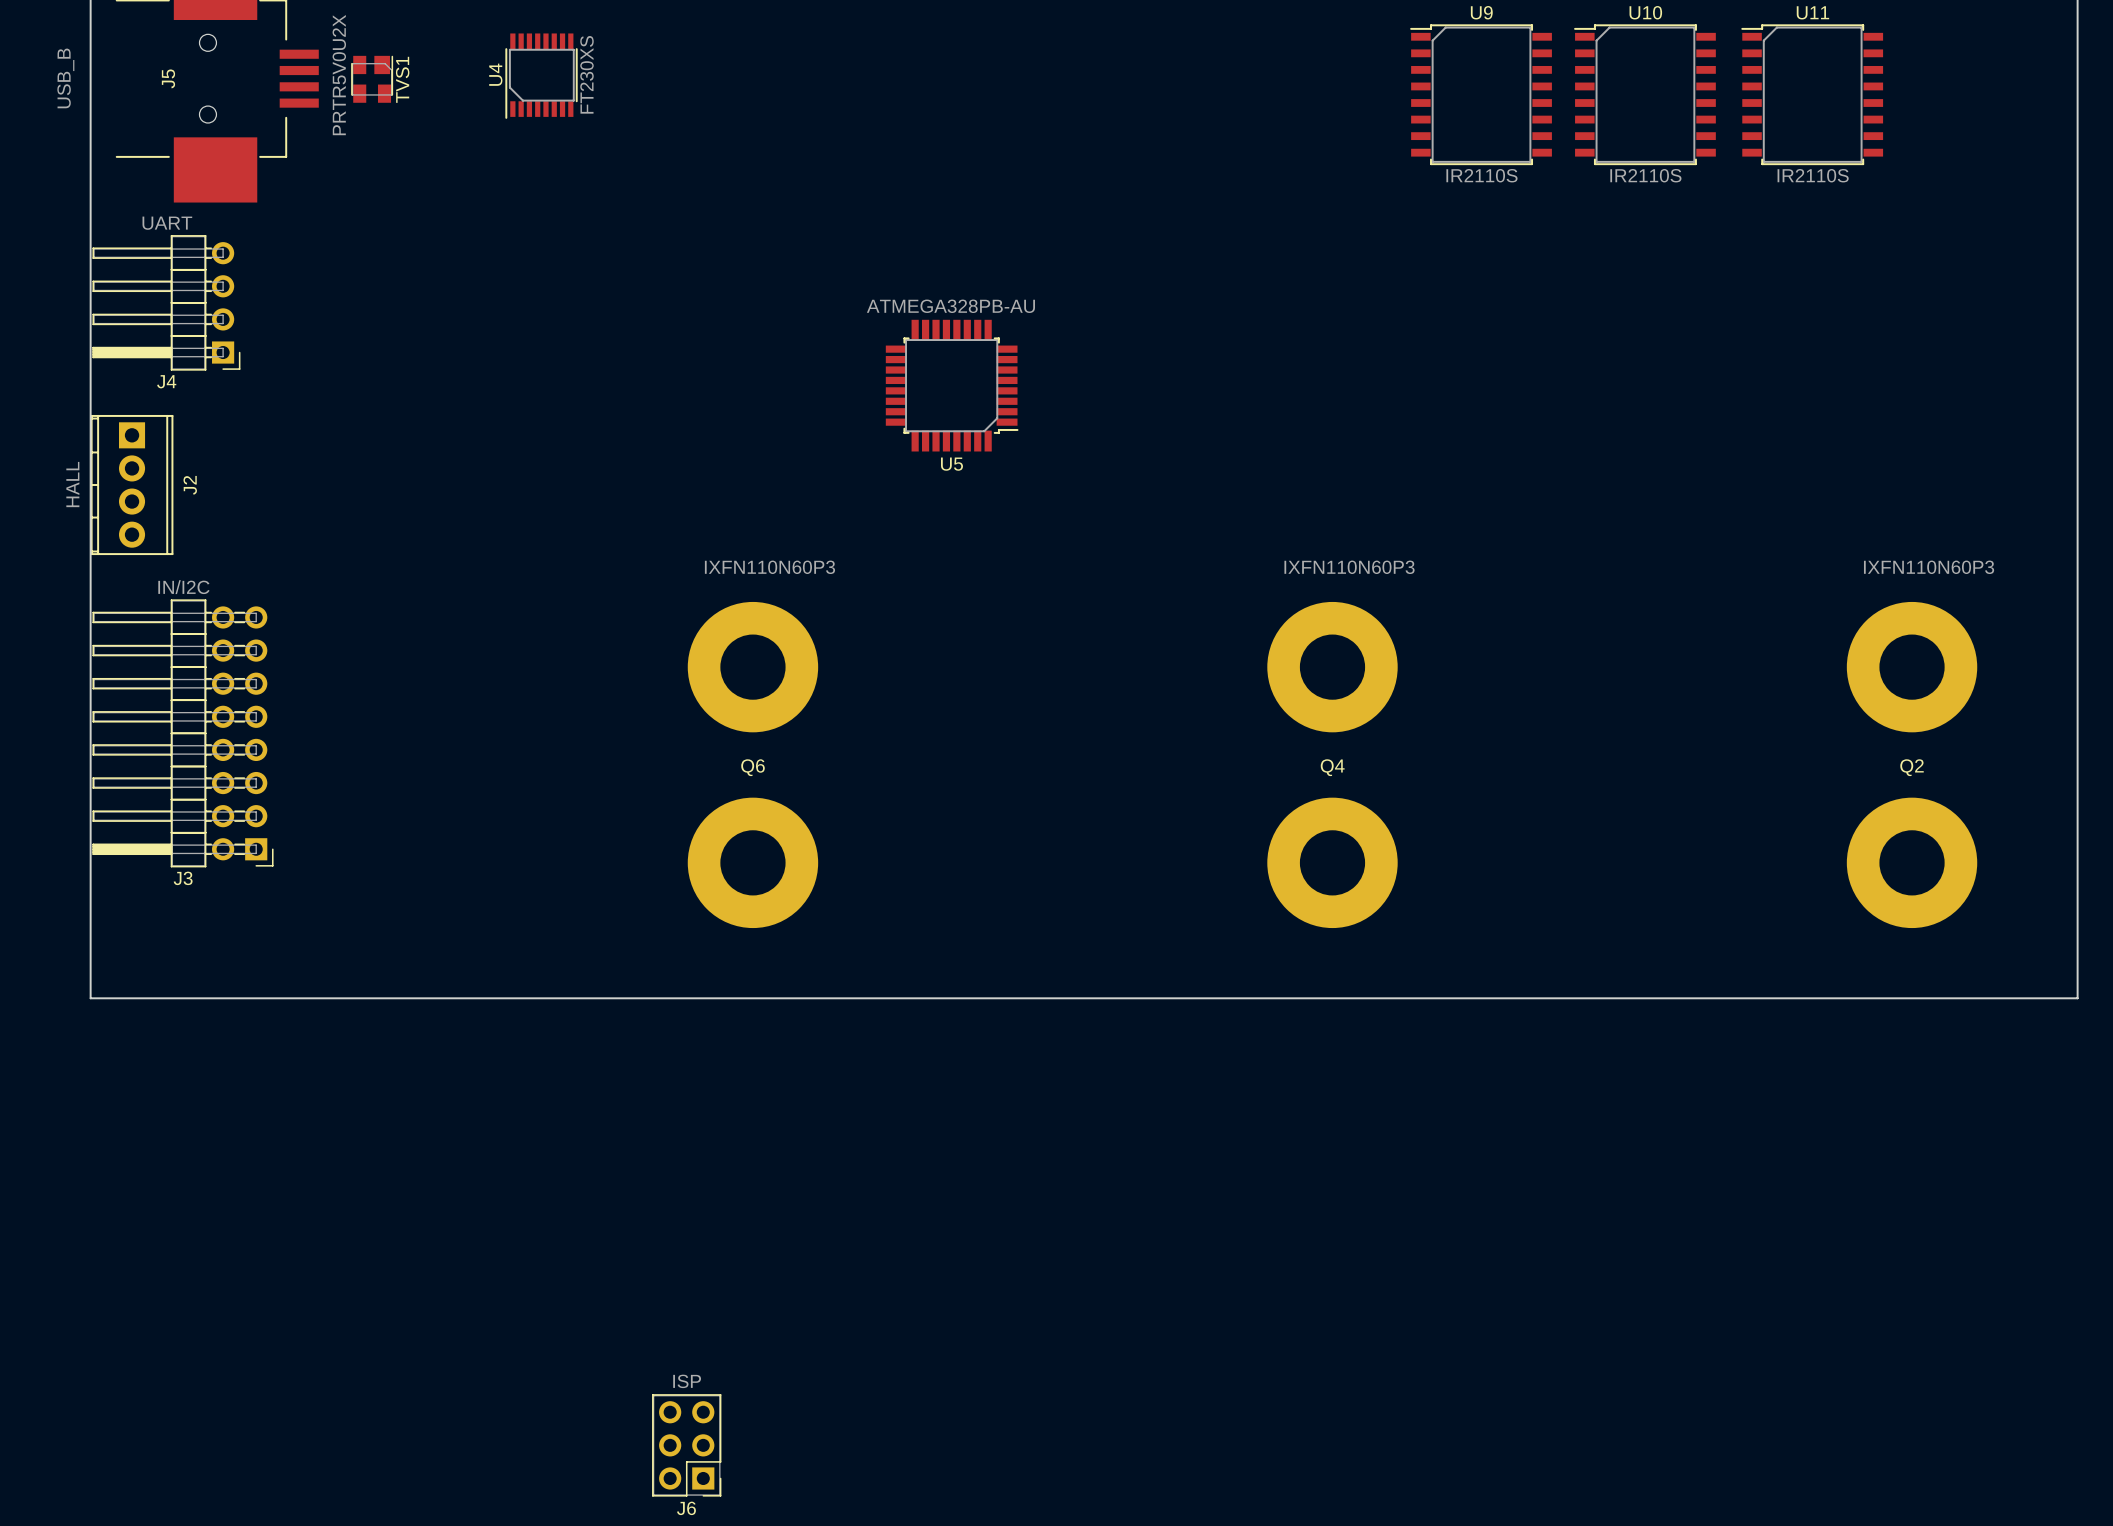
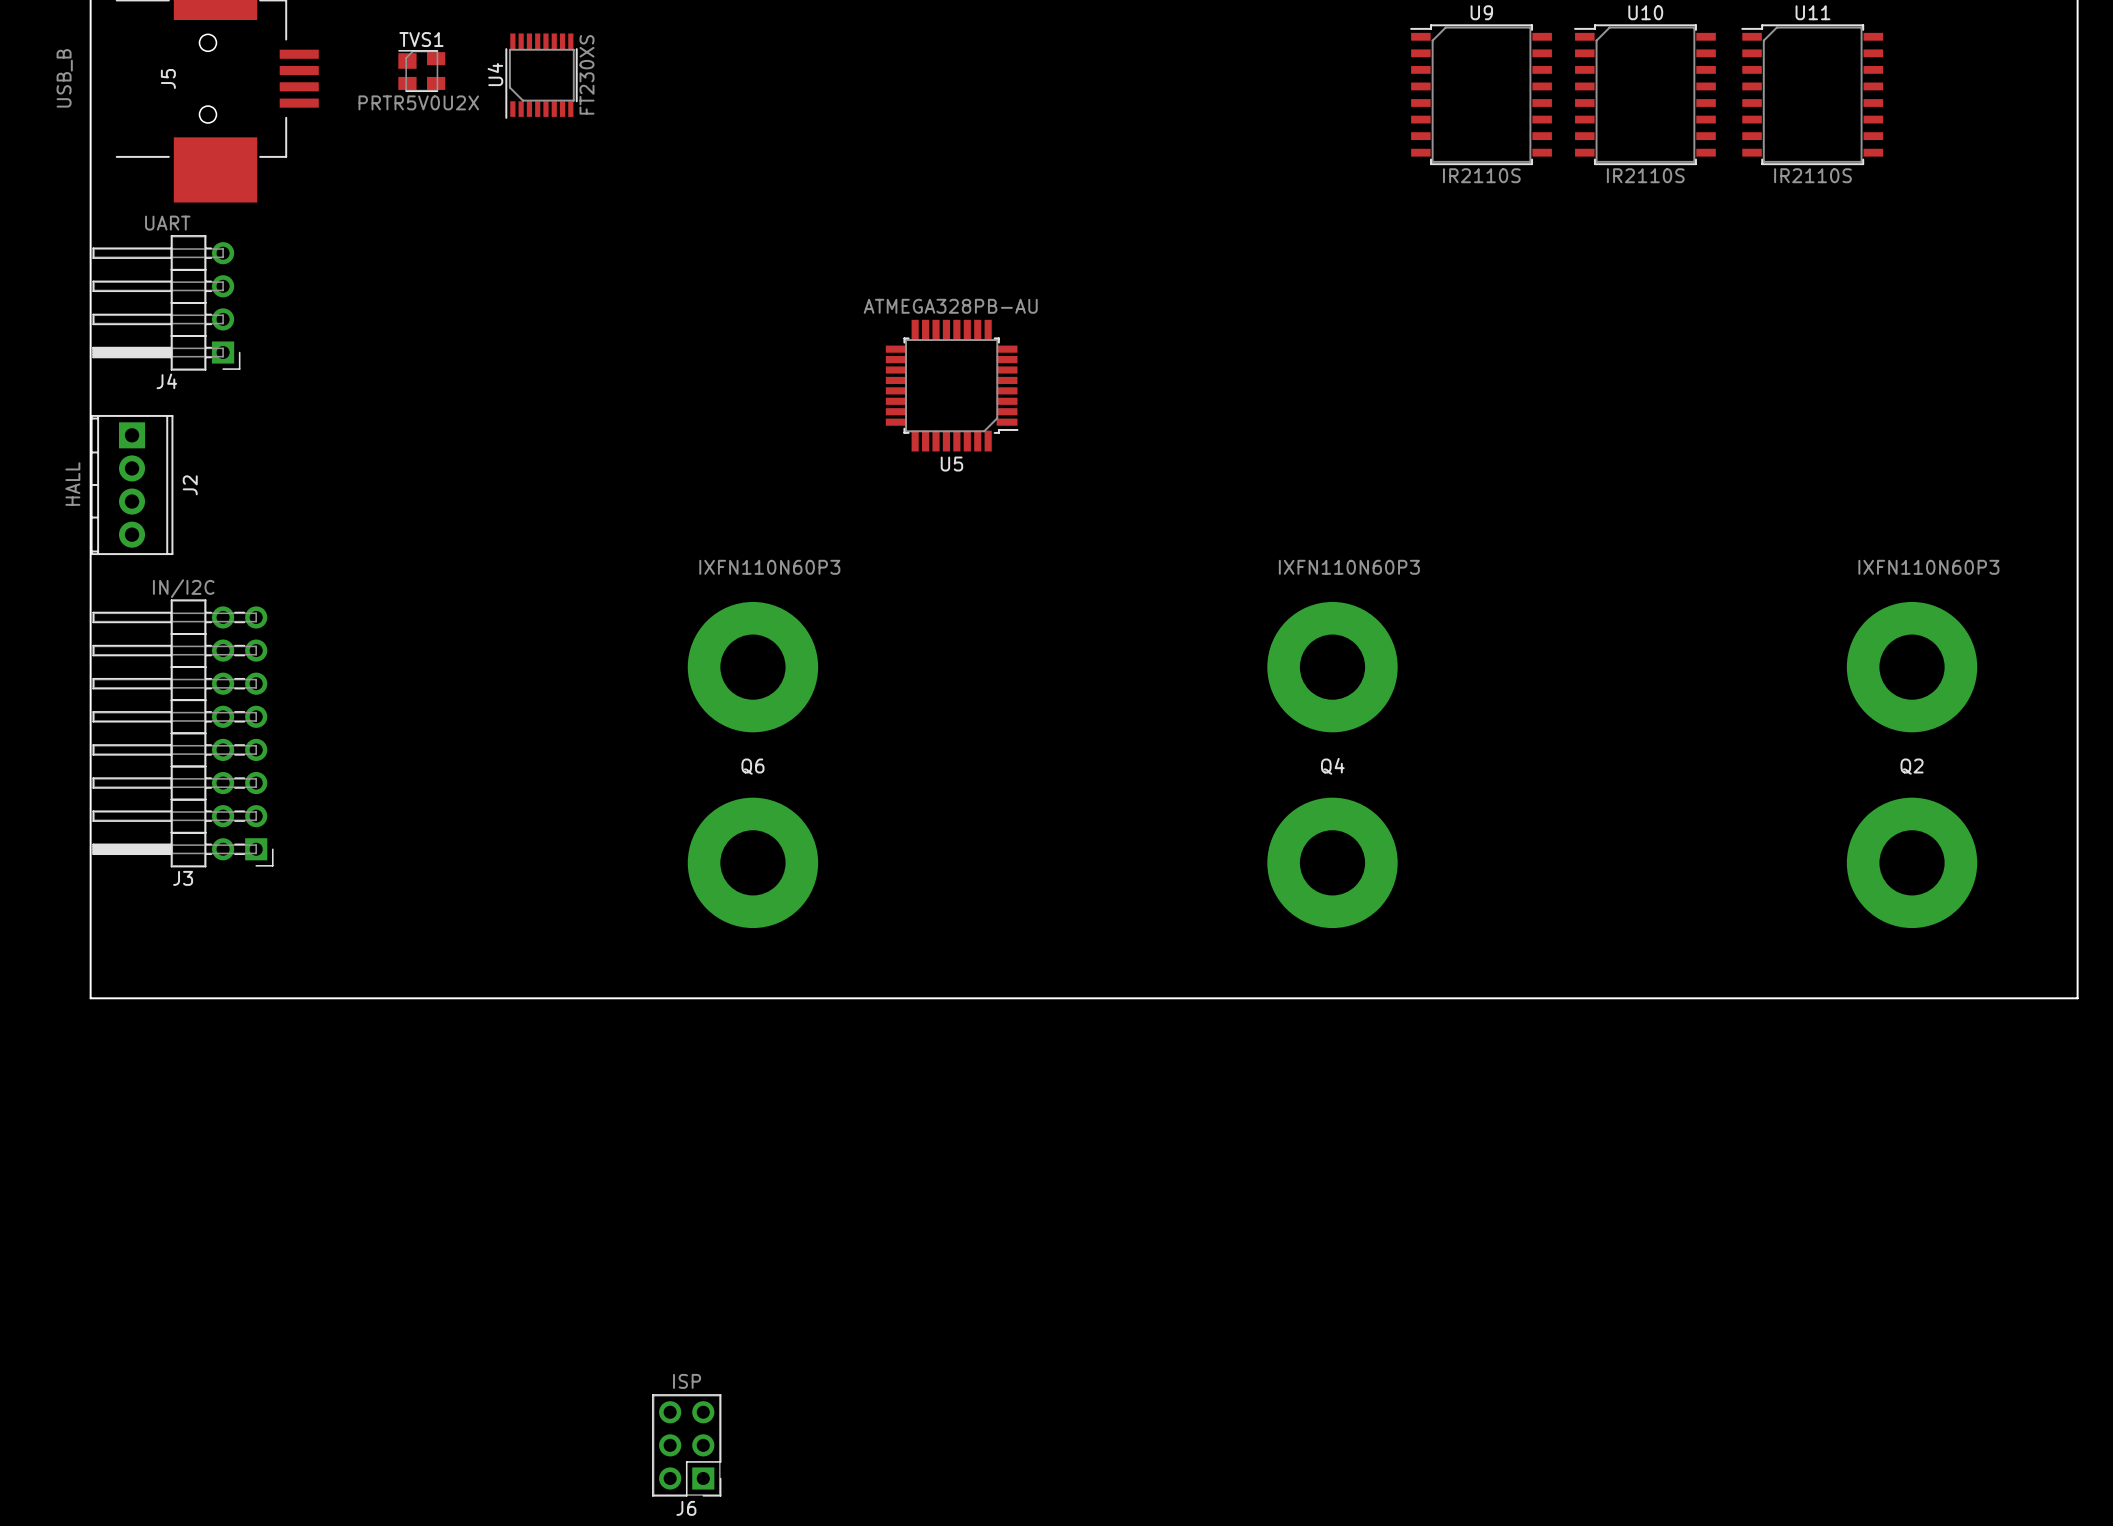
TVS1 rotation: 0° (372, 79) -> 90° counterclockwise (421, 71)
TVS1 position: (372, 79) -> (421, 71)

